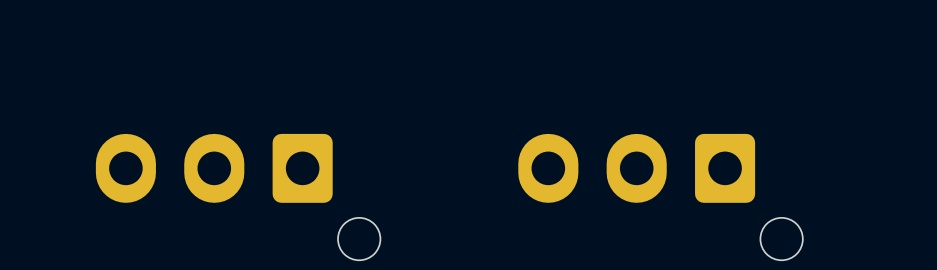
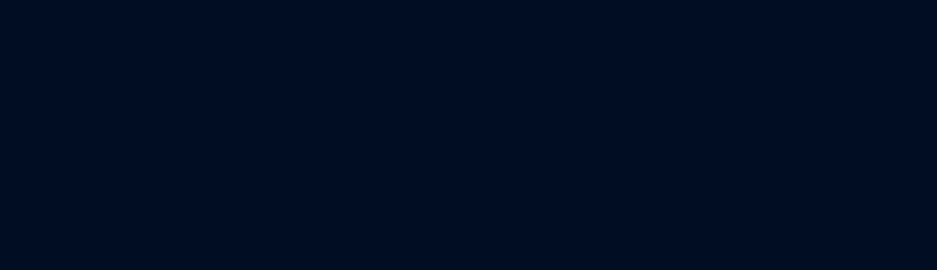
part: (238, 197) -> none
part: (660, 197) -> none

